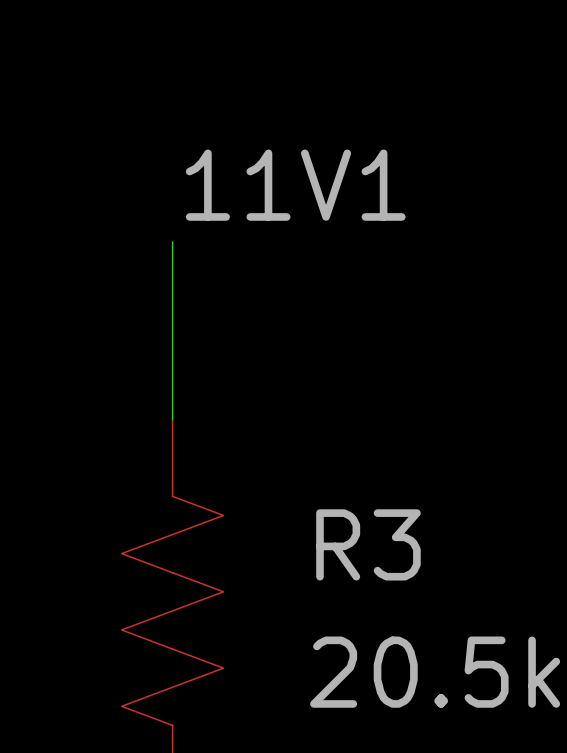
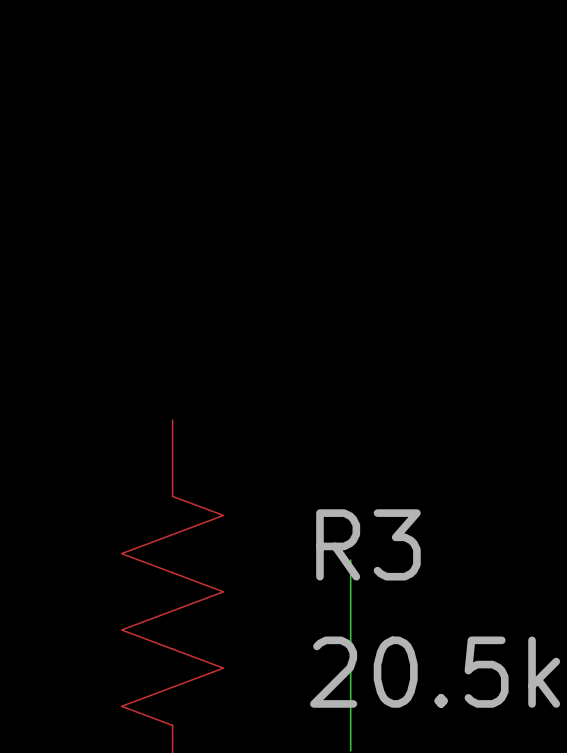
label: 11V1 (295, 185) -> none
wire: (172, 241) (172, 420) -> none
wire: none -> (350, 560) (350, 750)

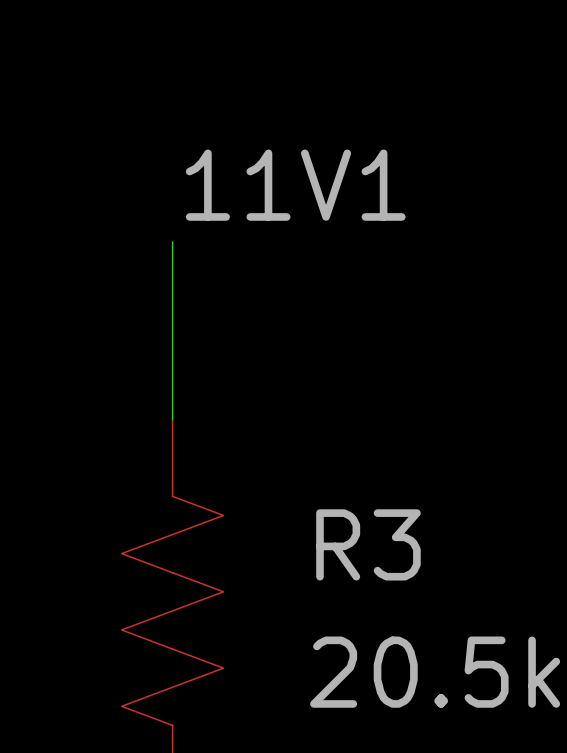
label: none -> 11V1 (295, 185)
wire: none -> (172, 241) (172, 420)
wire: (350, 560) (350, 750) -> none

